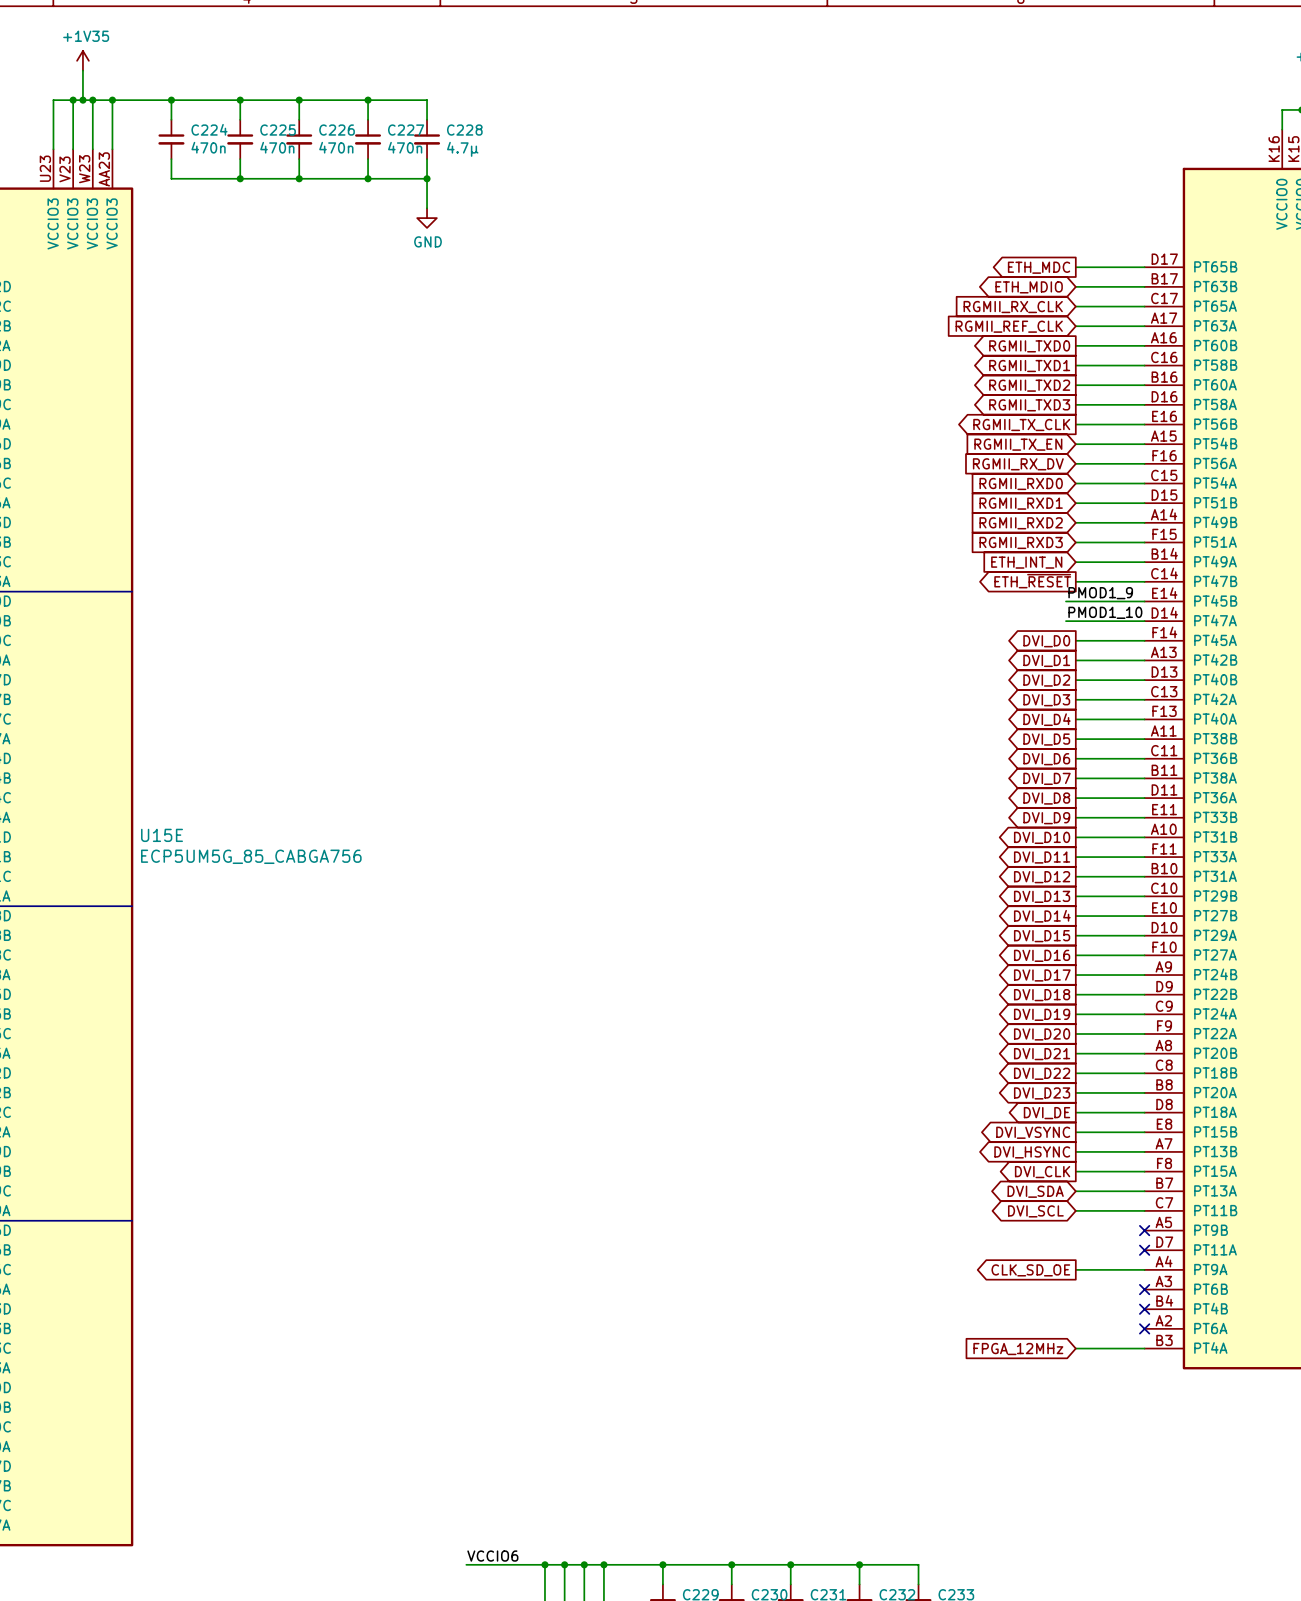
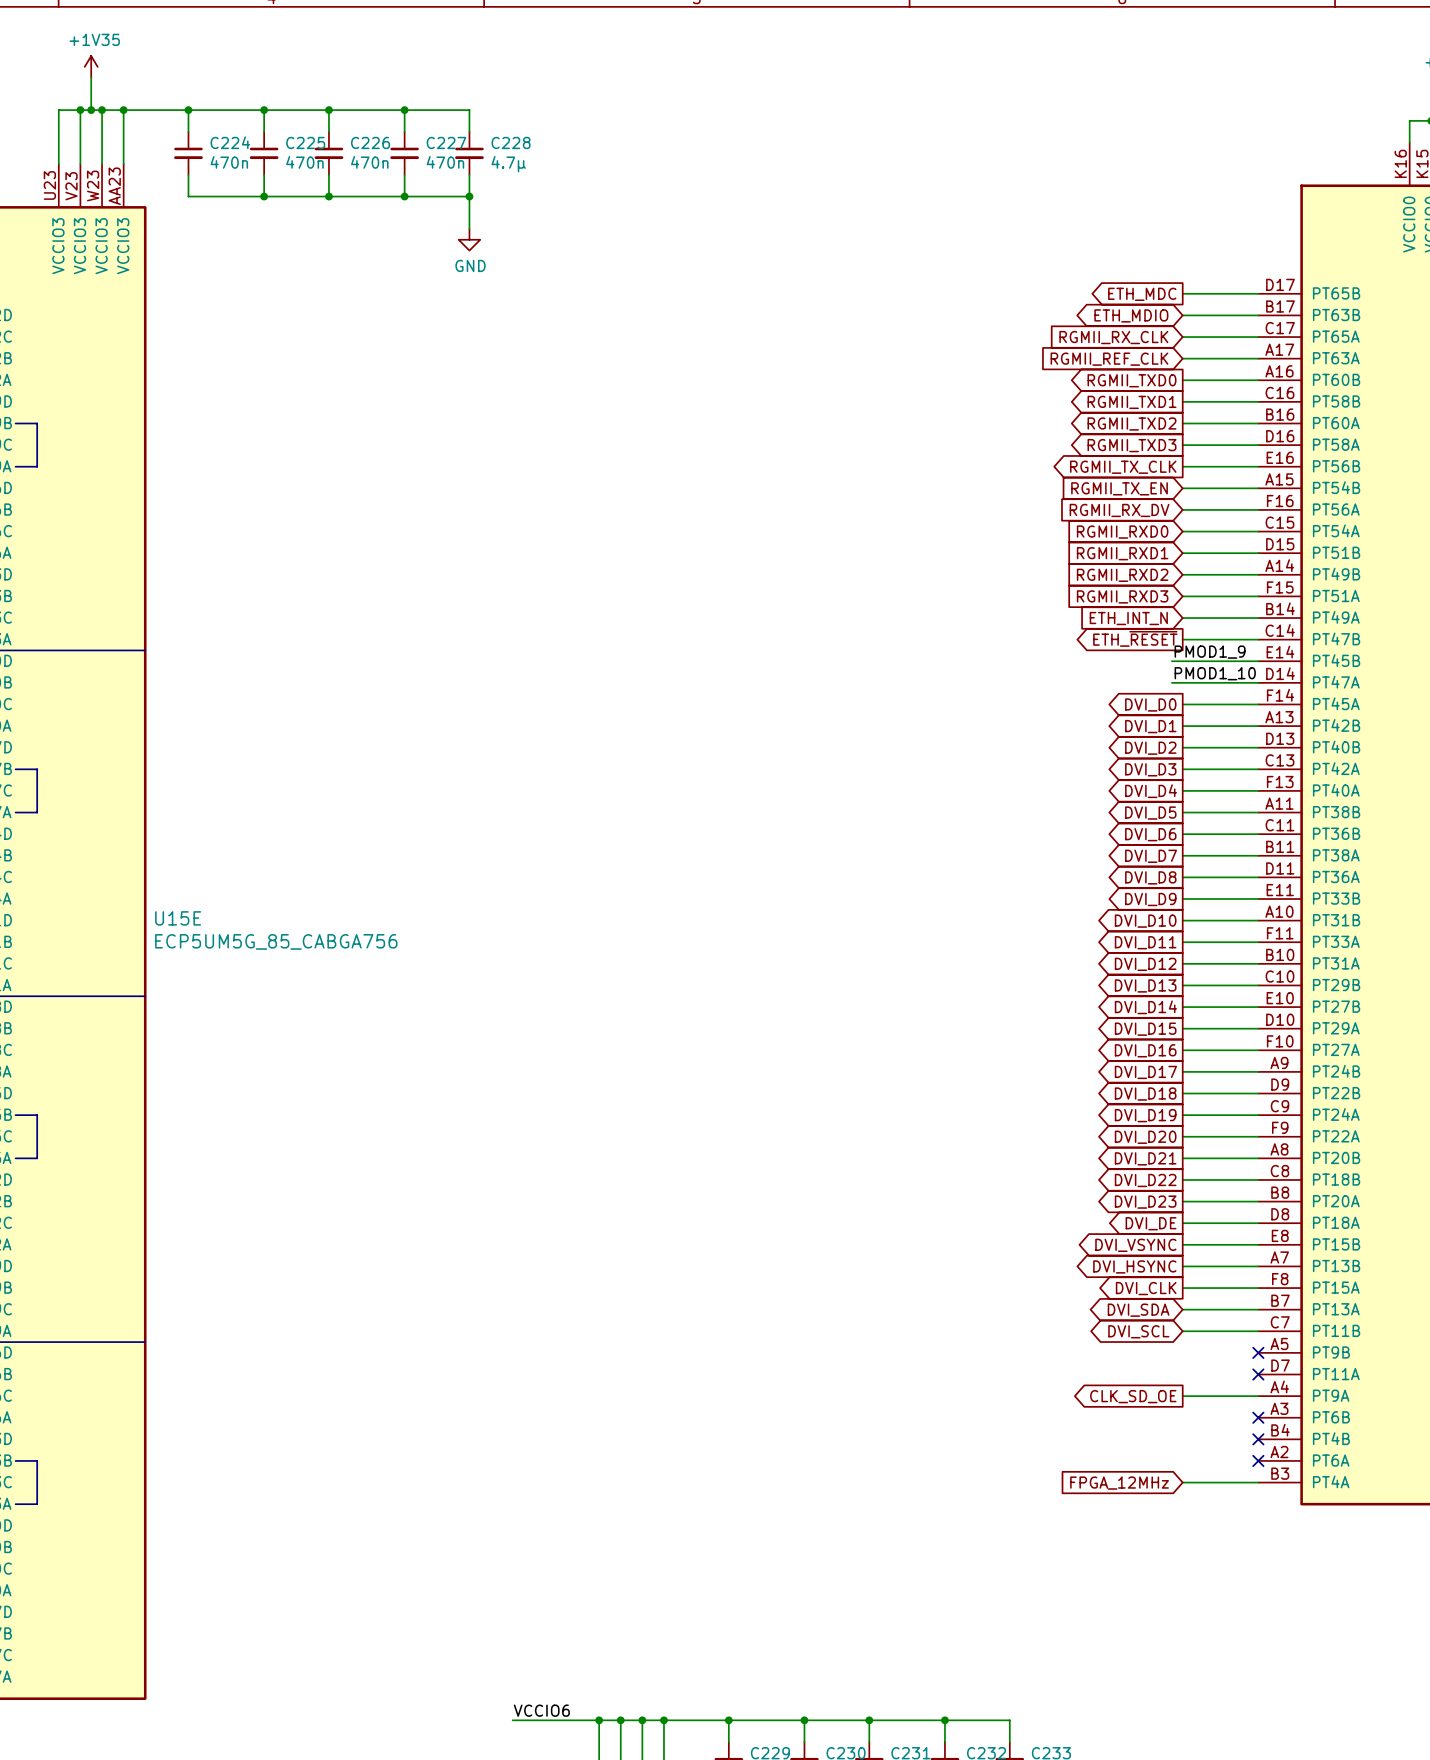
bus: none -> (15, 423) (37, 423) (37, 466) (15, 466)
bus: none -> (15, 769) (37, 769) (37, 812) (15, 812)
bus: none -> (15, 1115) (37, 1115) (37, 1158) (15, 1158)
bus: none -> (15, 1460) (37, 1460) (37, 1504) (15, 1504)

